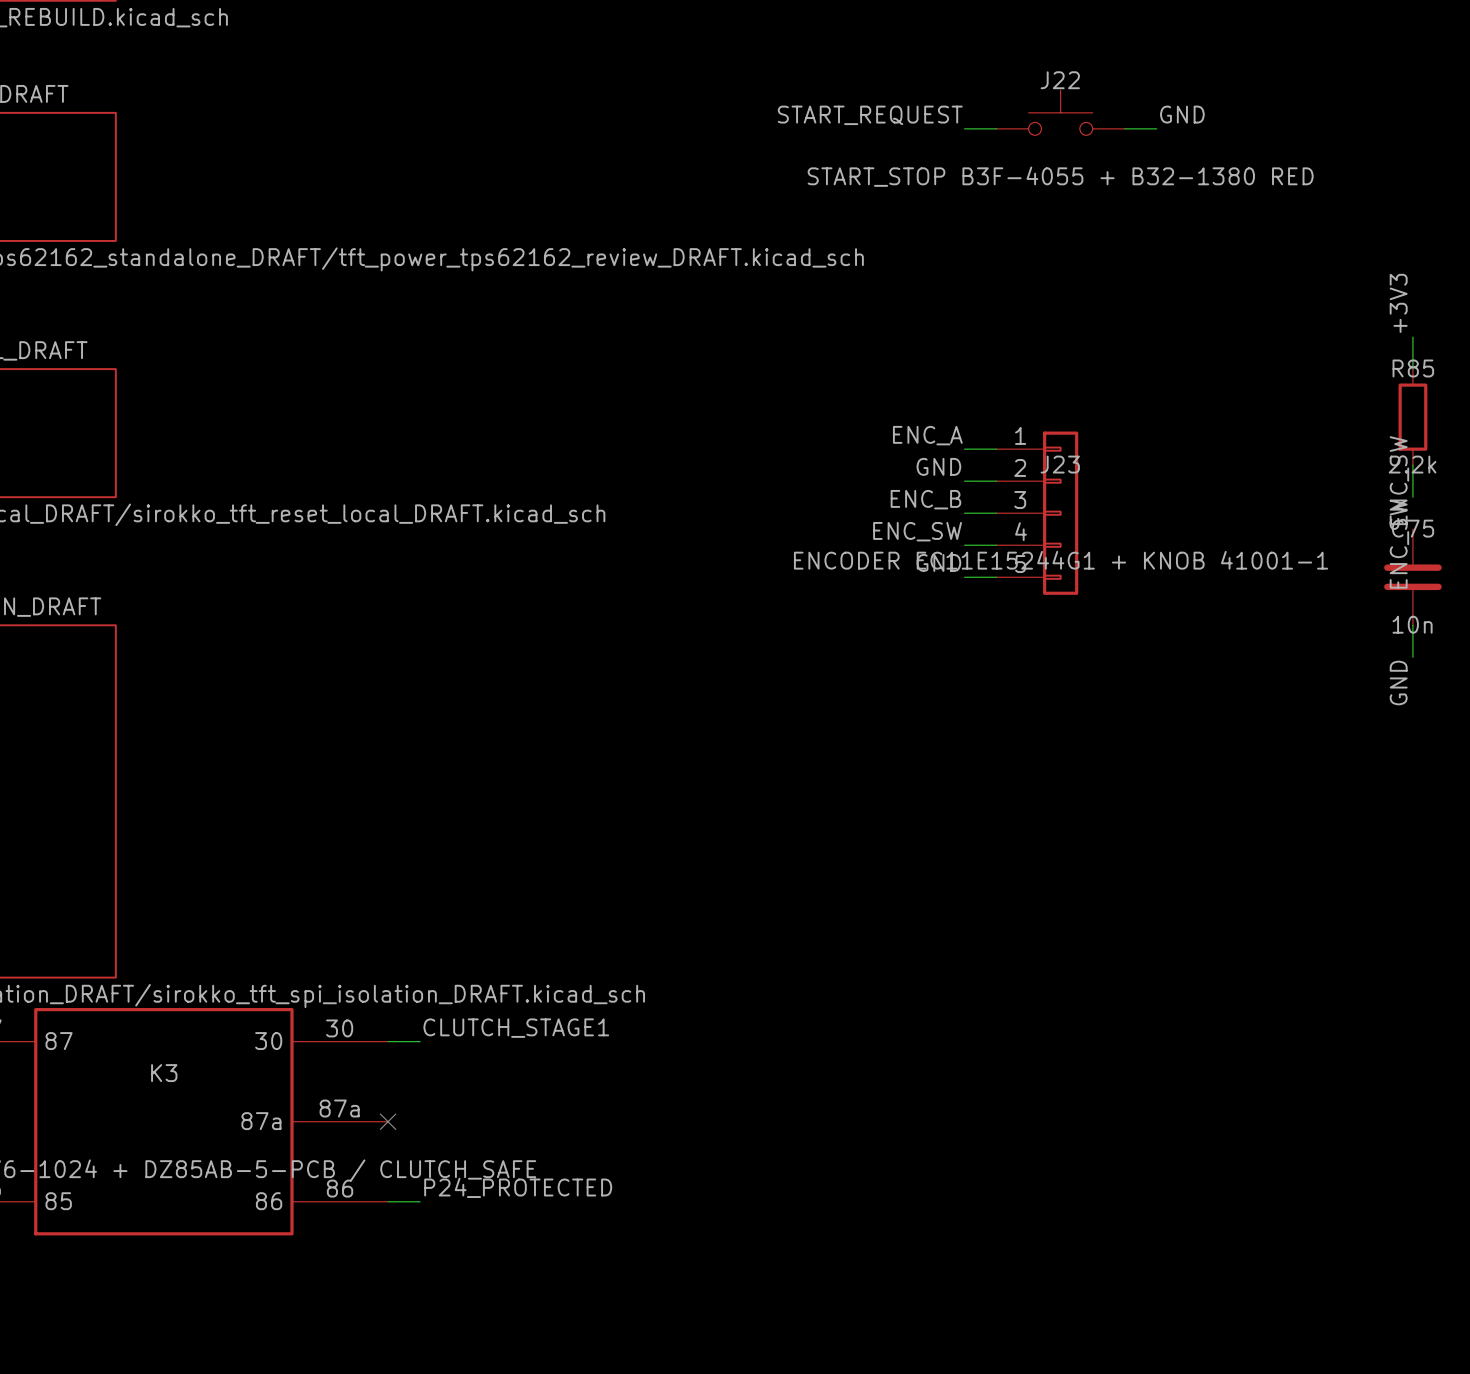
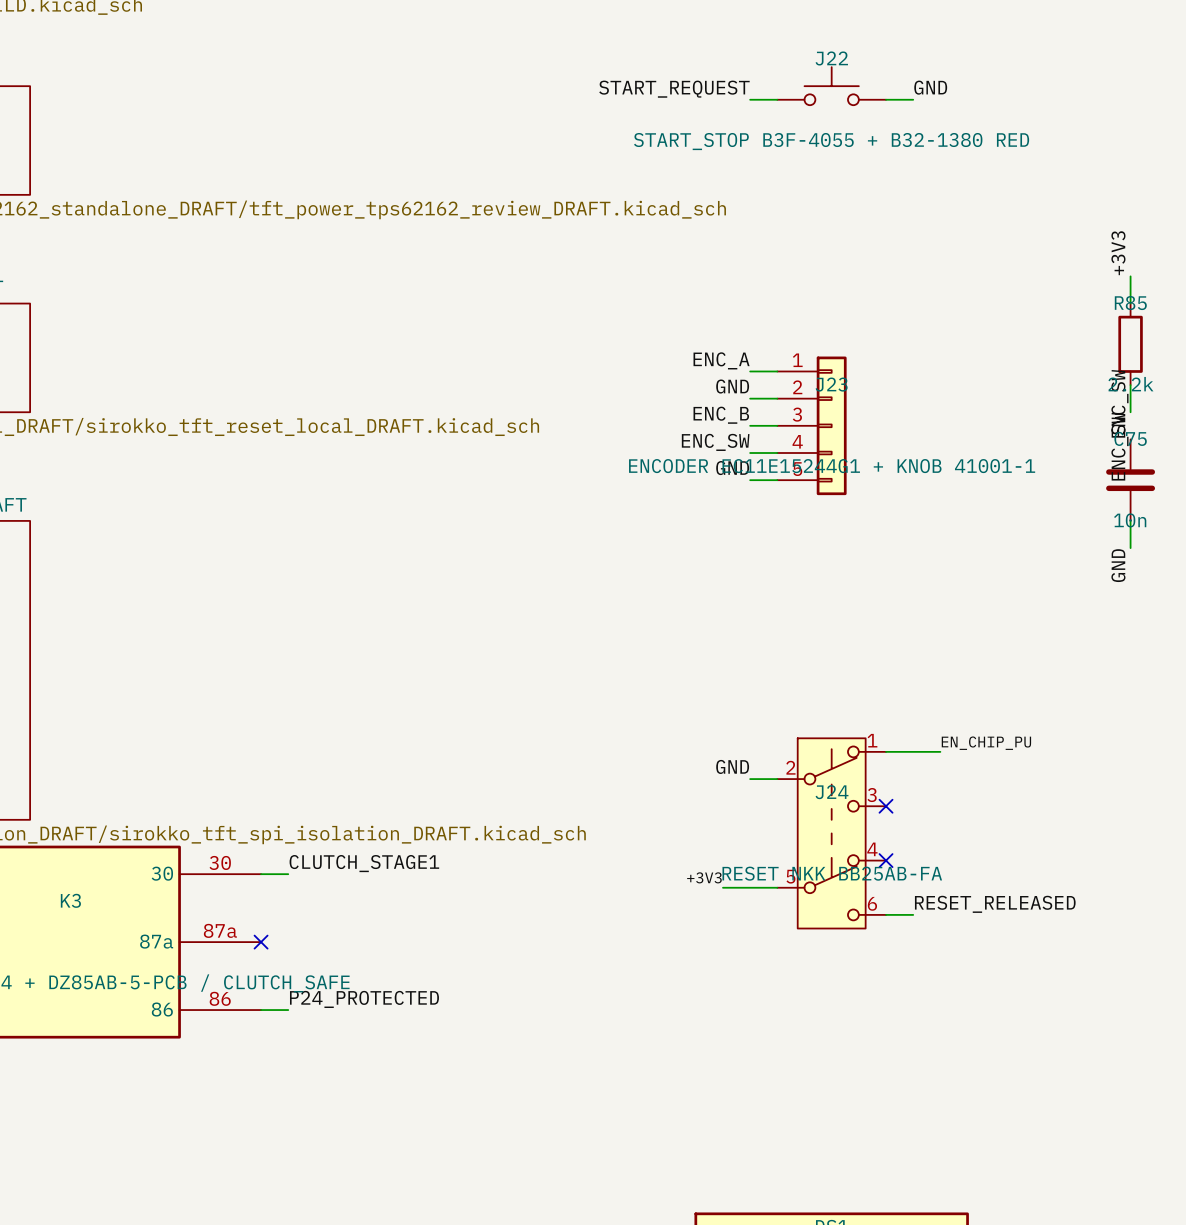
label: none -> EN_CHIP_PU (986, 743)
wire: none -> (886, 751) (940, 751)
label: none -> GND (732, 766)
wire: none -> (750, 779) (777, 779)
no-connect mark: none -> (886, 806)
J24: none -> RESET NKK BB25AB-FA (831, 833)
no-connect mark: none -> (886, 860)
label: none -> +3V3 (704, 877)
wire: none -> (722, 887) (777, 887)
label: none -> RESET_RELEASED (995, 904)
wire: none -> (886, 914) (913, 914)

